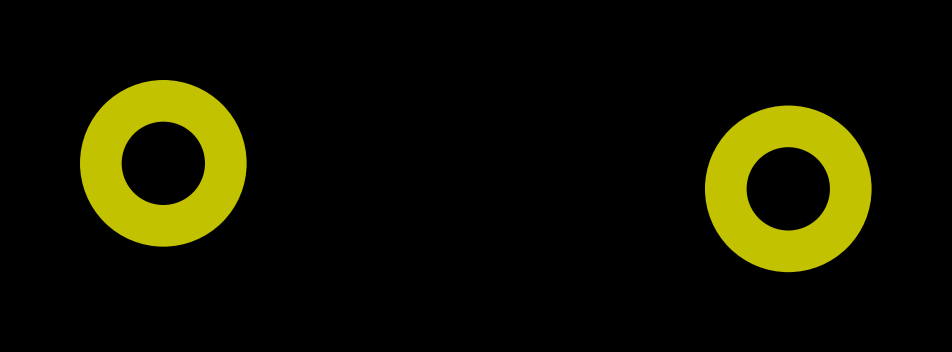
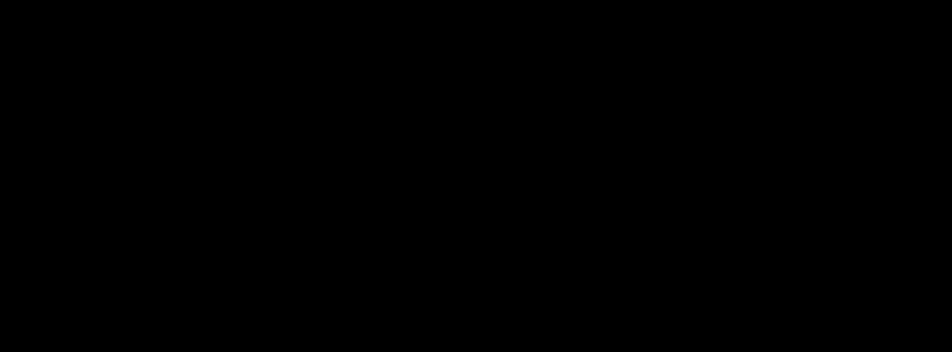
part: (163, 163) -> none
part: (788, 188) -> none

